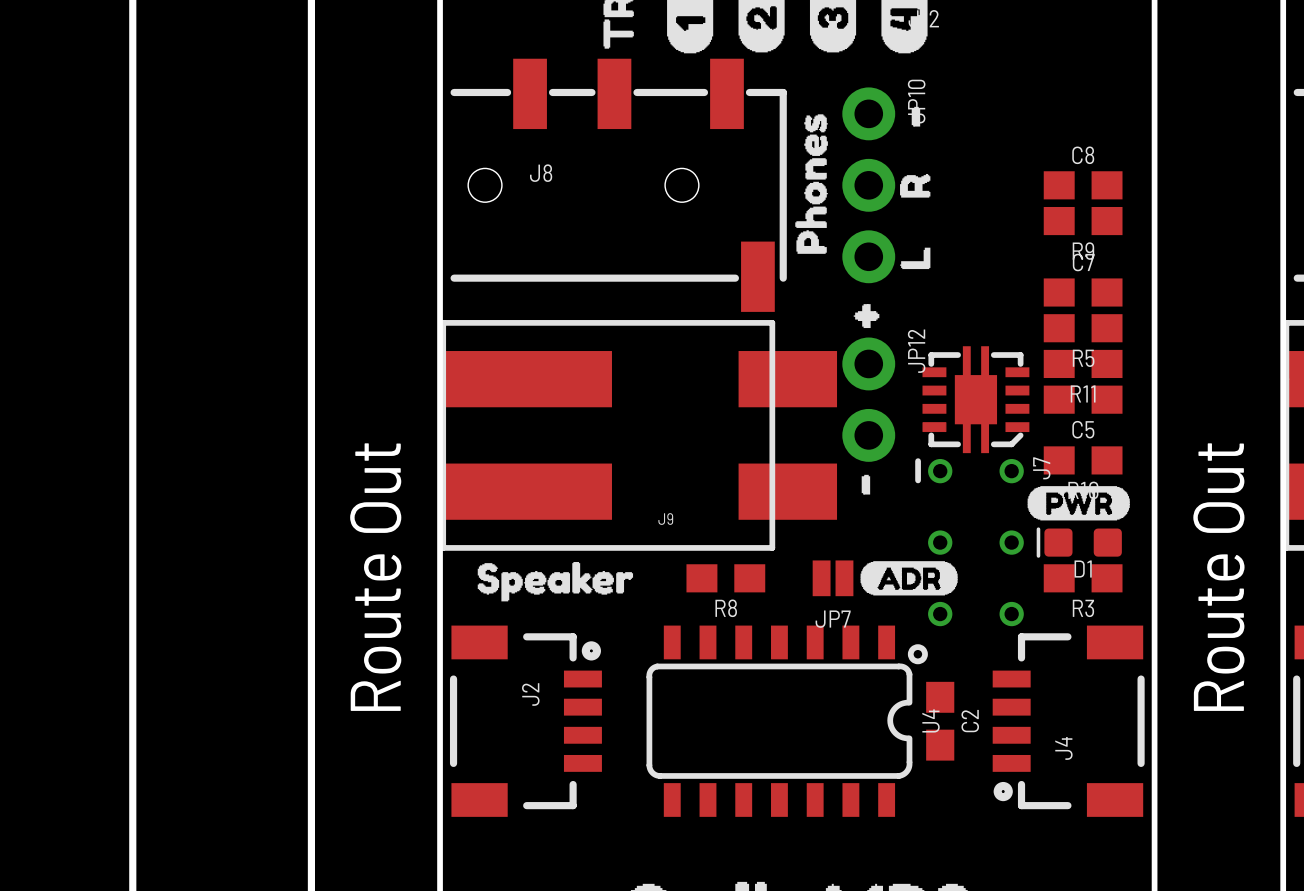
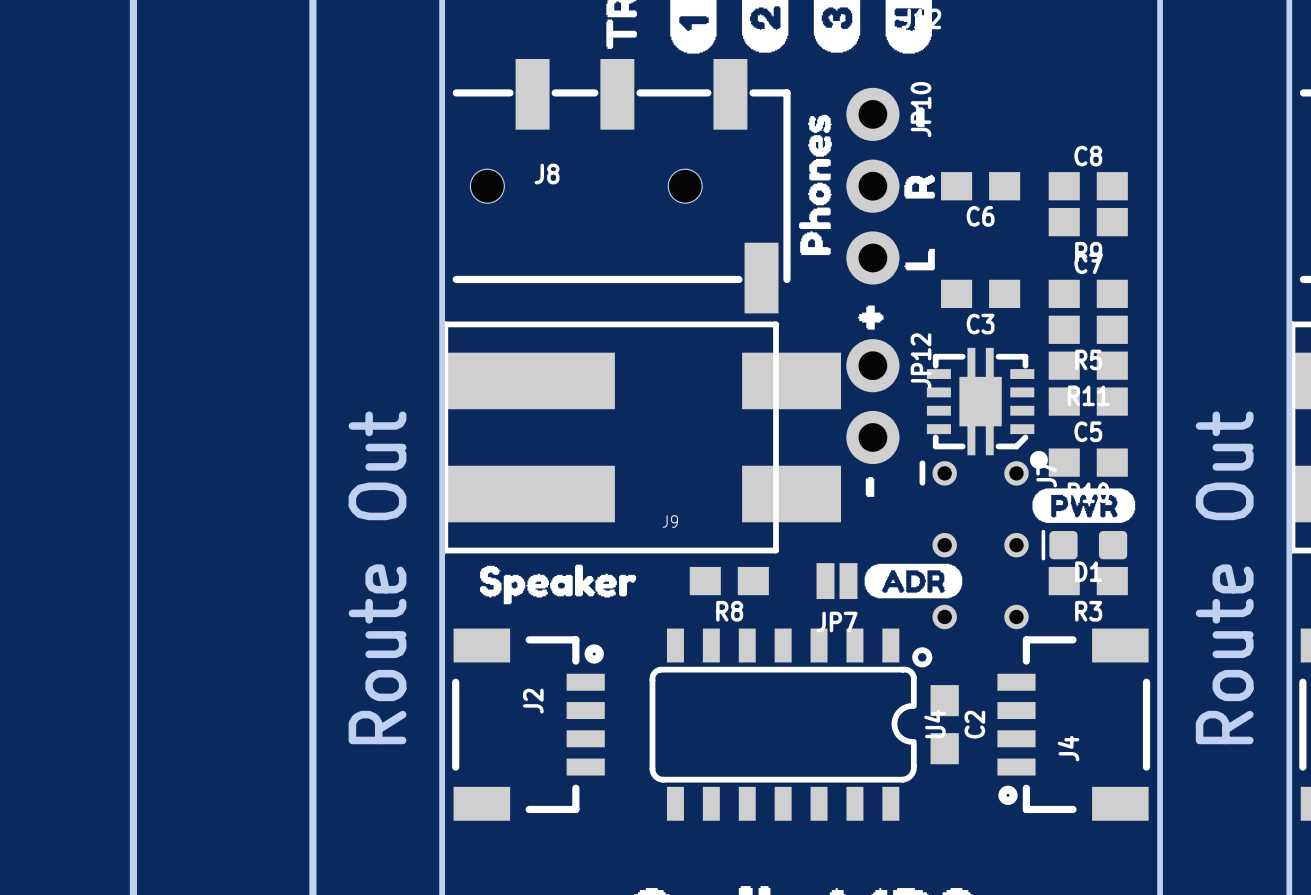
C6: none -> (980, 186)
C3: none -> (980, 293)
part footprint: [922, 346, 1030, 454] -> [926, 347, 1048, 469]

